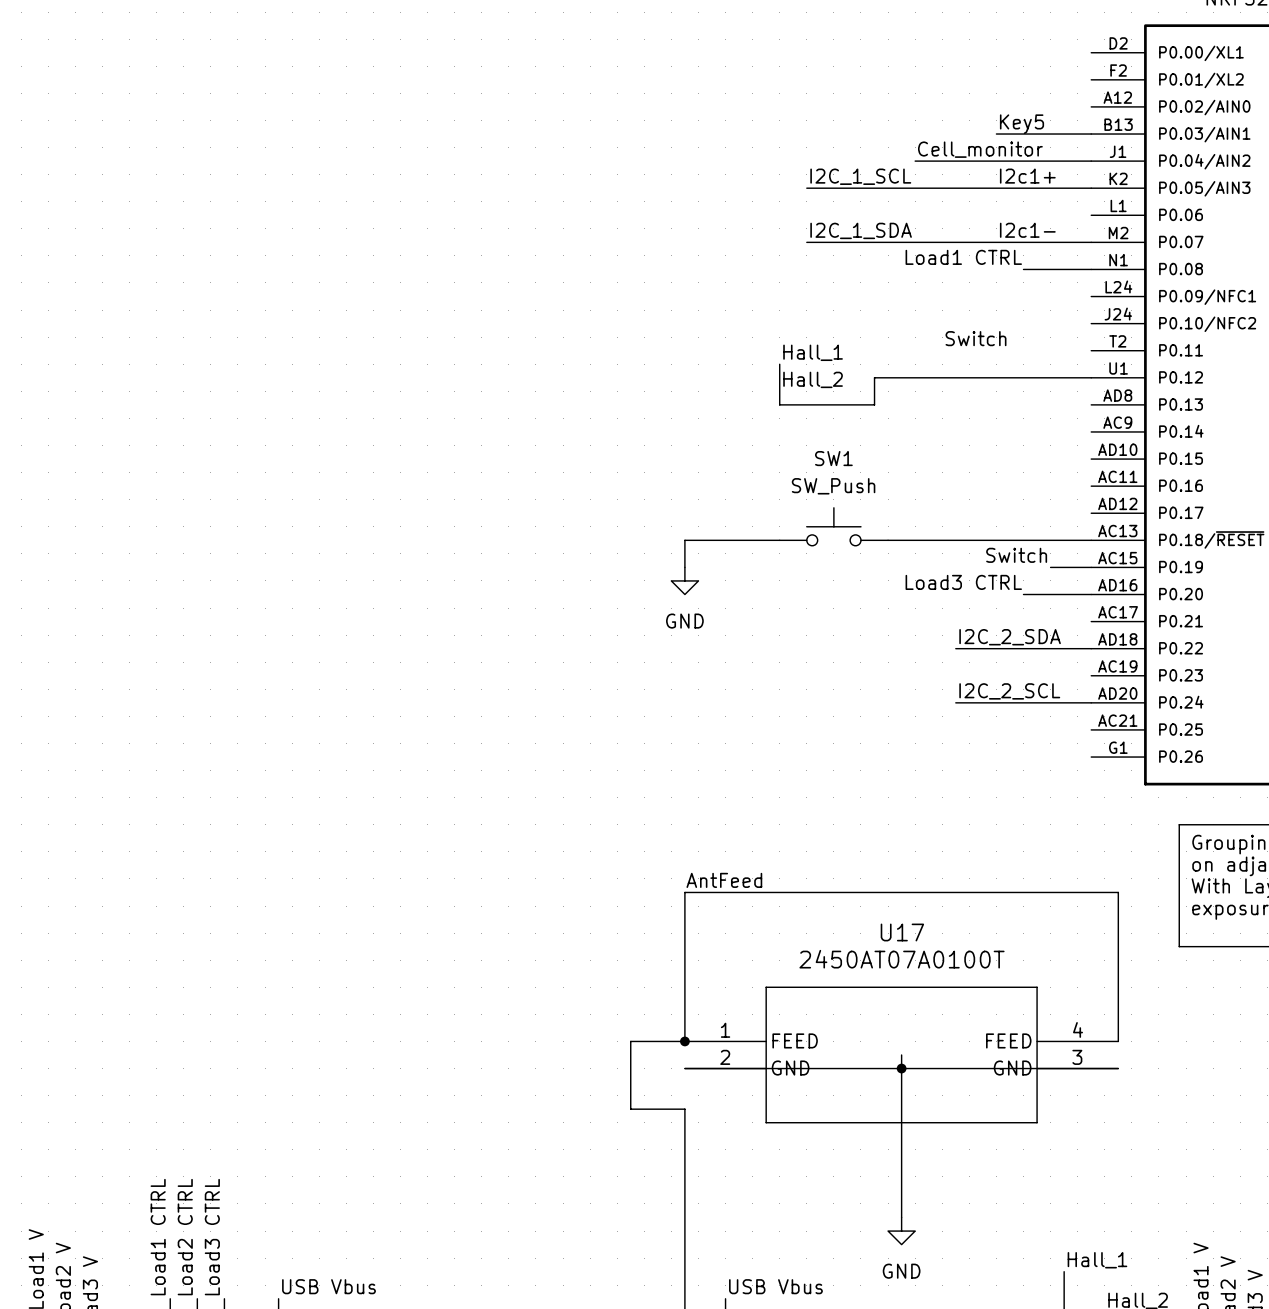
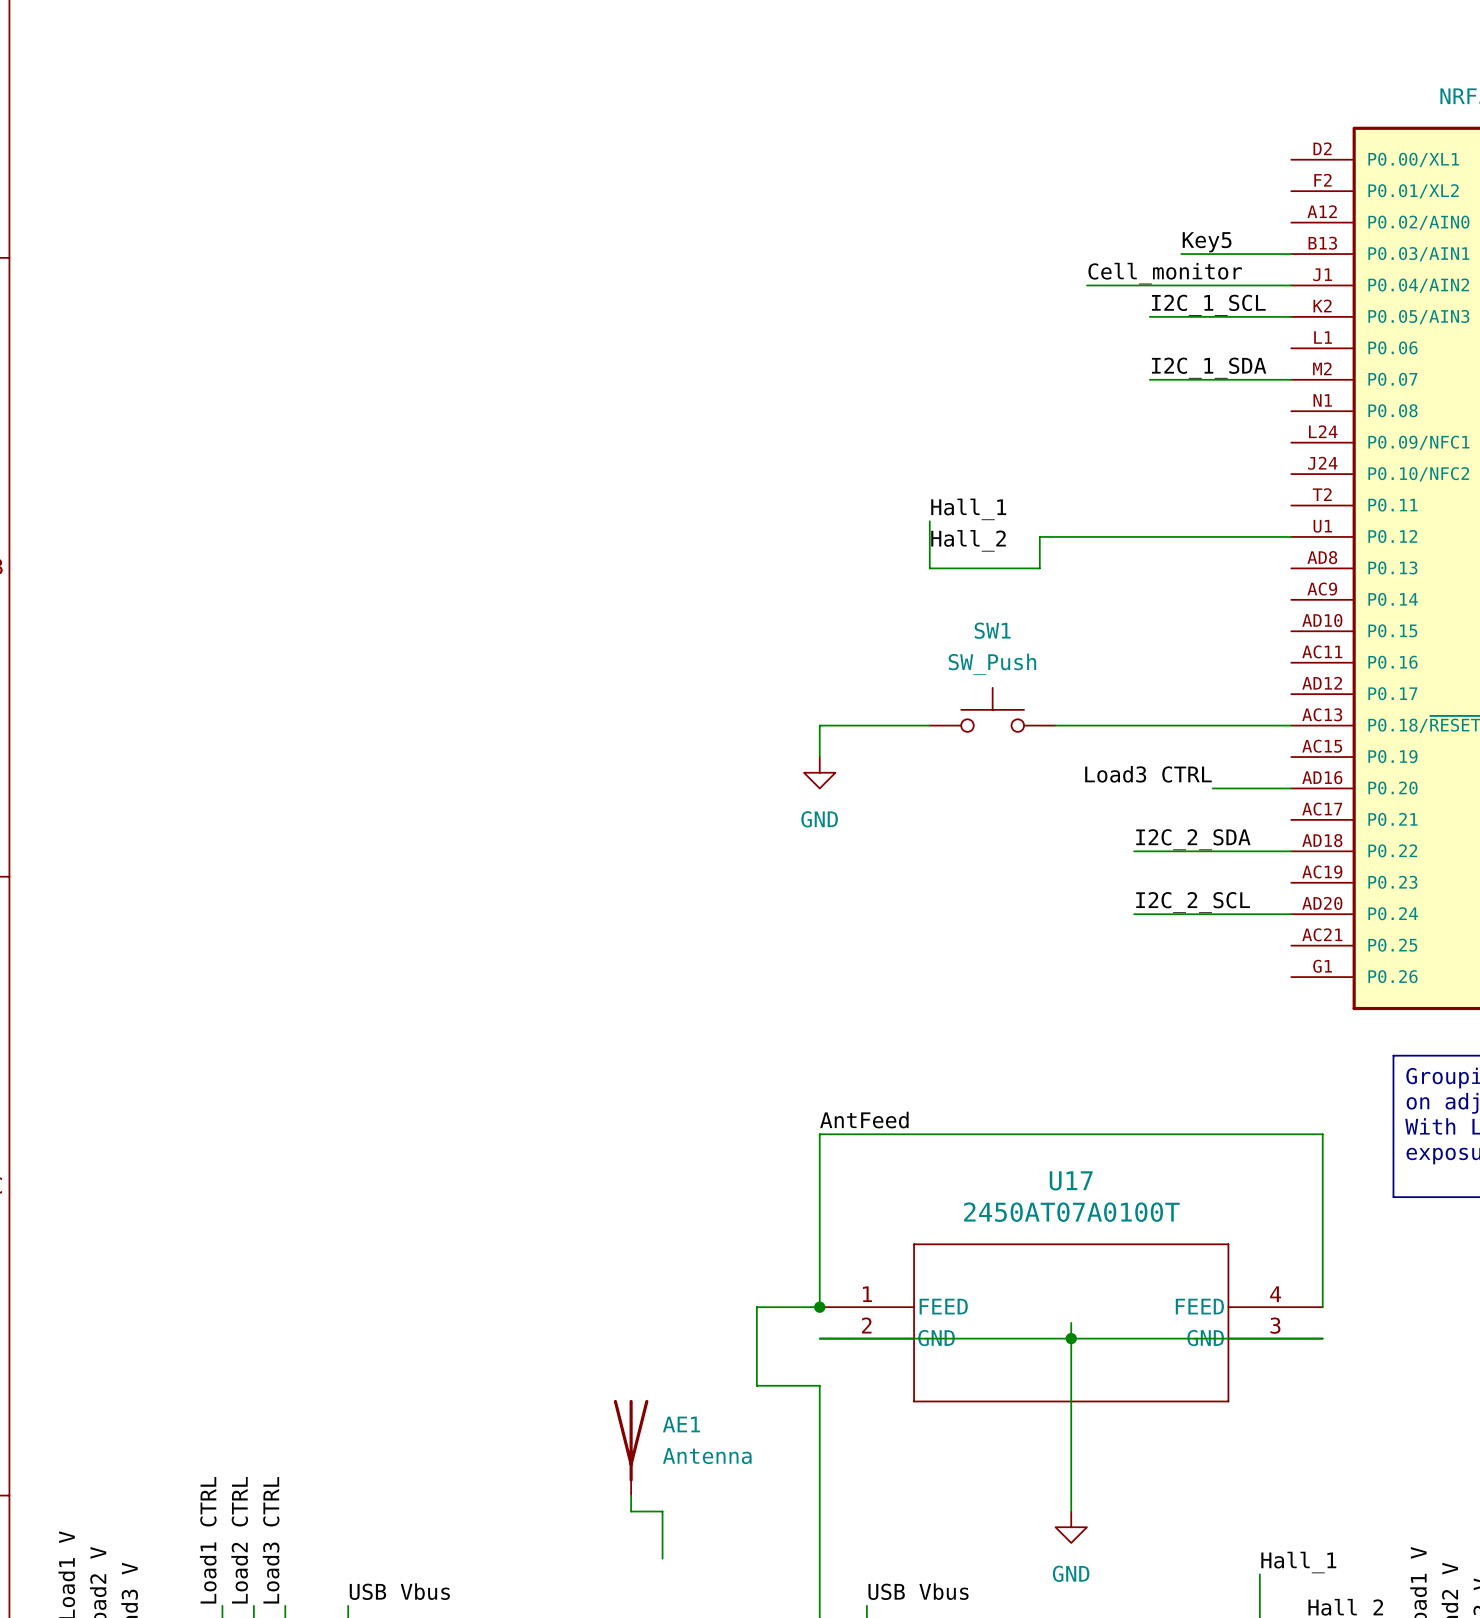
label position: I2C_1_SCL (860, 176) -> I2C_1_SCL (1208, 305)
label: I2c1+ (1027, 176) -> none
wire: (806, 188) (969, 188) -> none
label position: I2C_1_SDA (861, 230) -> I2C_1_SDA (1209, 368)
label: I2c1- (1027, 230) -> none
wire: (806, 242) (969, 242) -> none
label: Load1 CTRL (963, 257) -> none
wire: (1023, 269) (1091, 269) -> none
label: Switch (976, 338) -> none
label: Switch (1016, 555) -> none
wire: (1050, 567) (1091, 567) -> none
AE1: none -> Antenna (631, 1447)
wire: none -> (631, 1495) (631, 1511) (662, 1511) (662, 1558)

